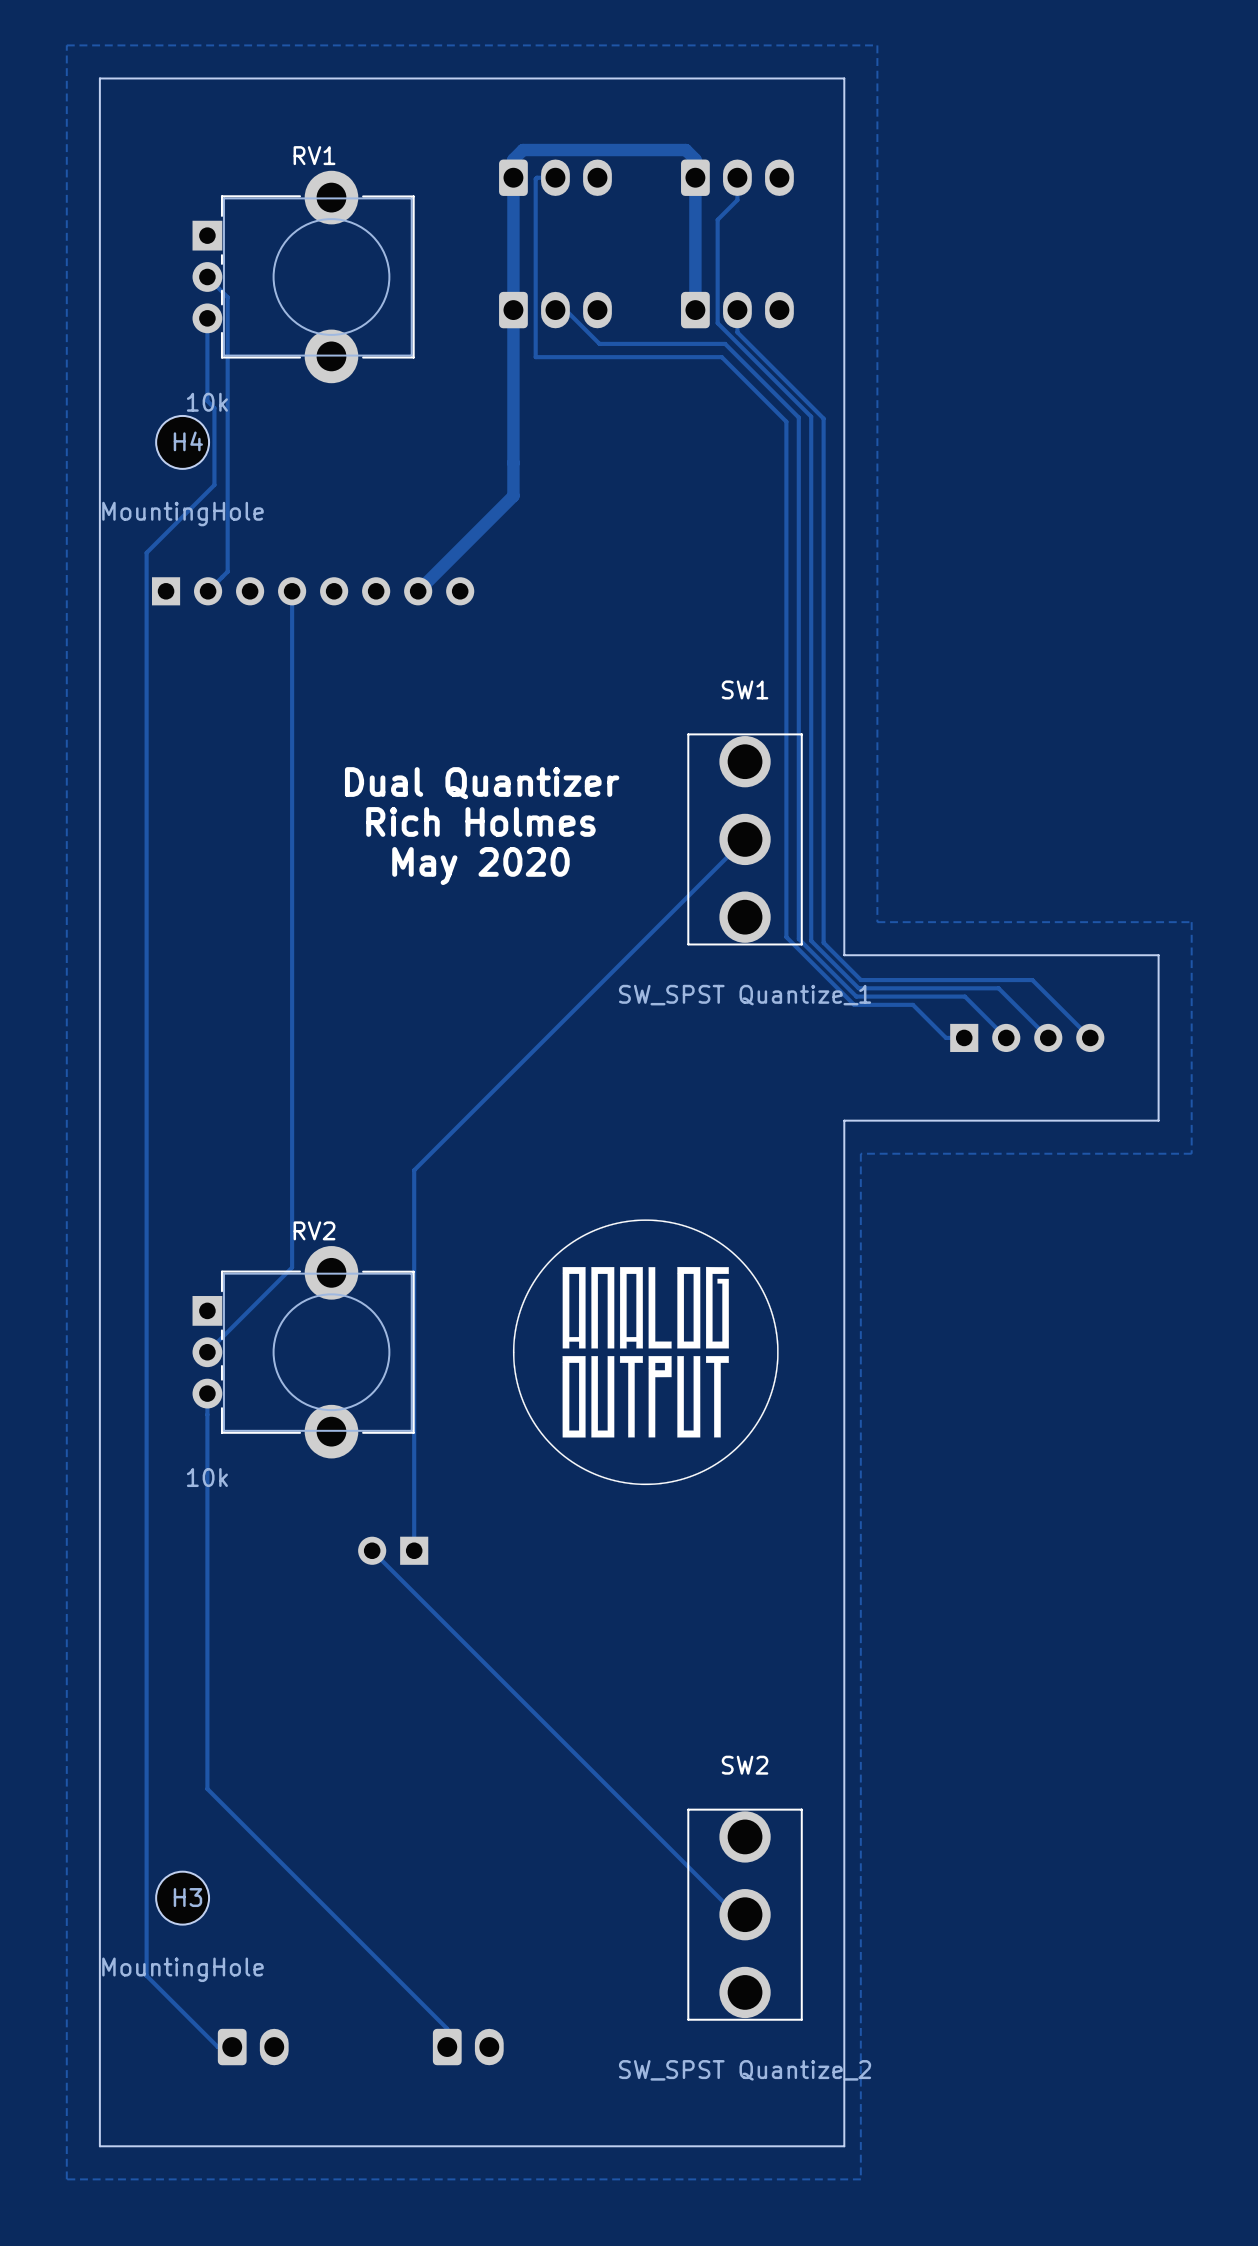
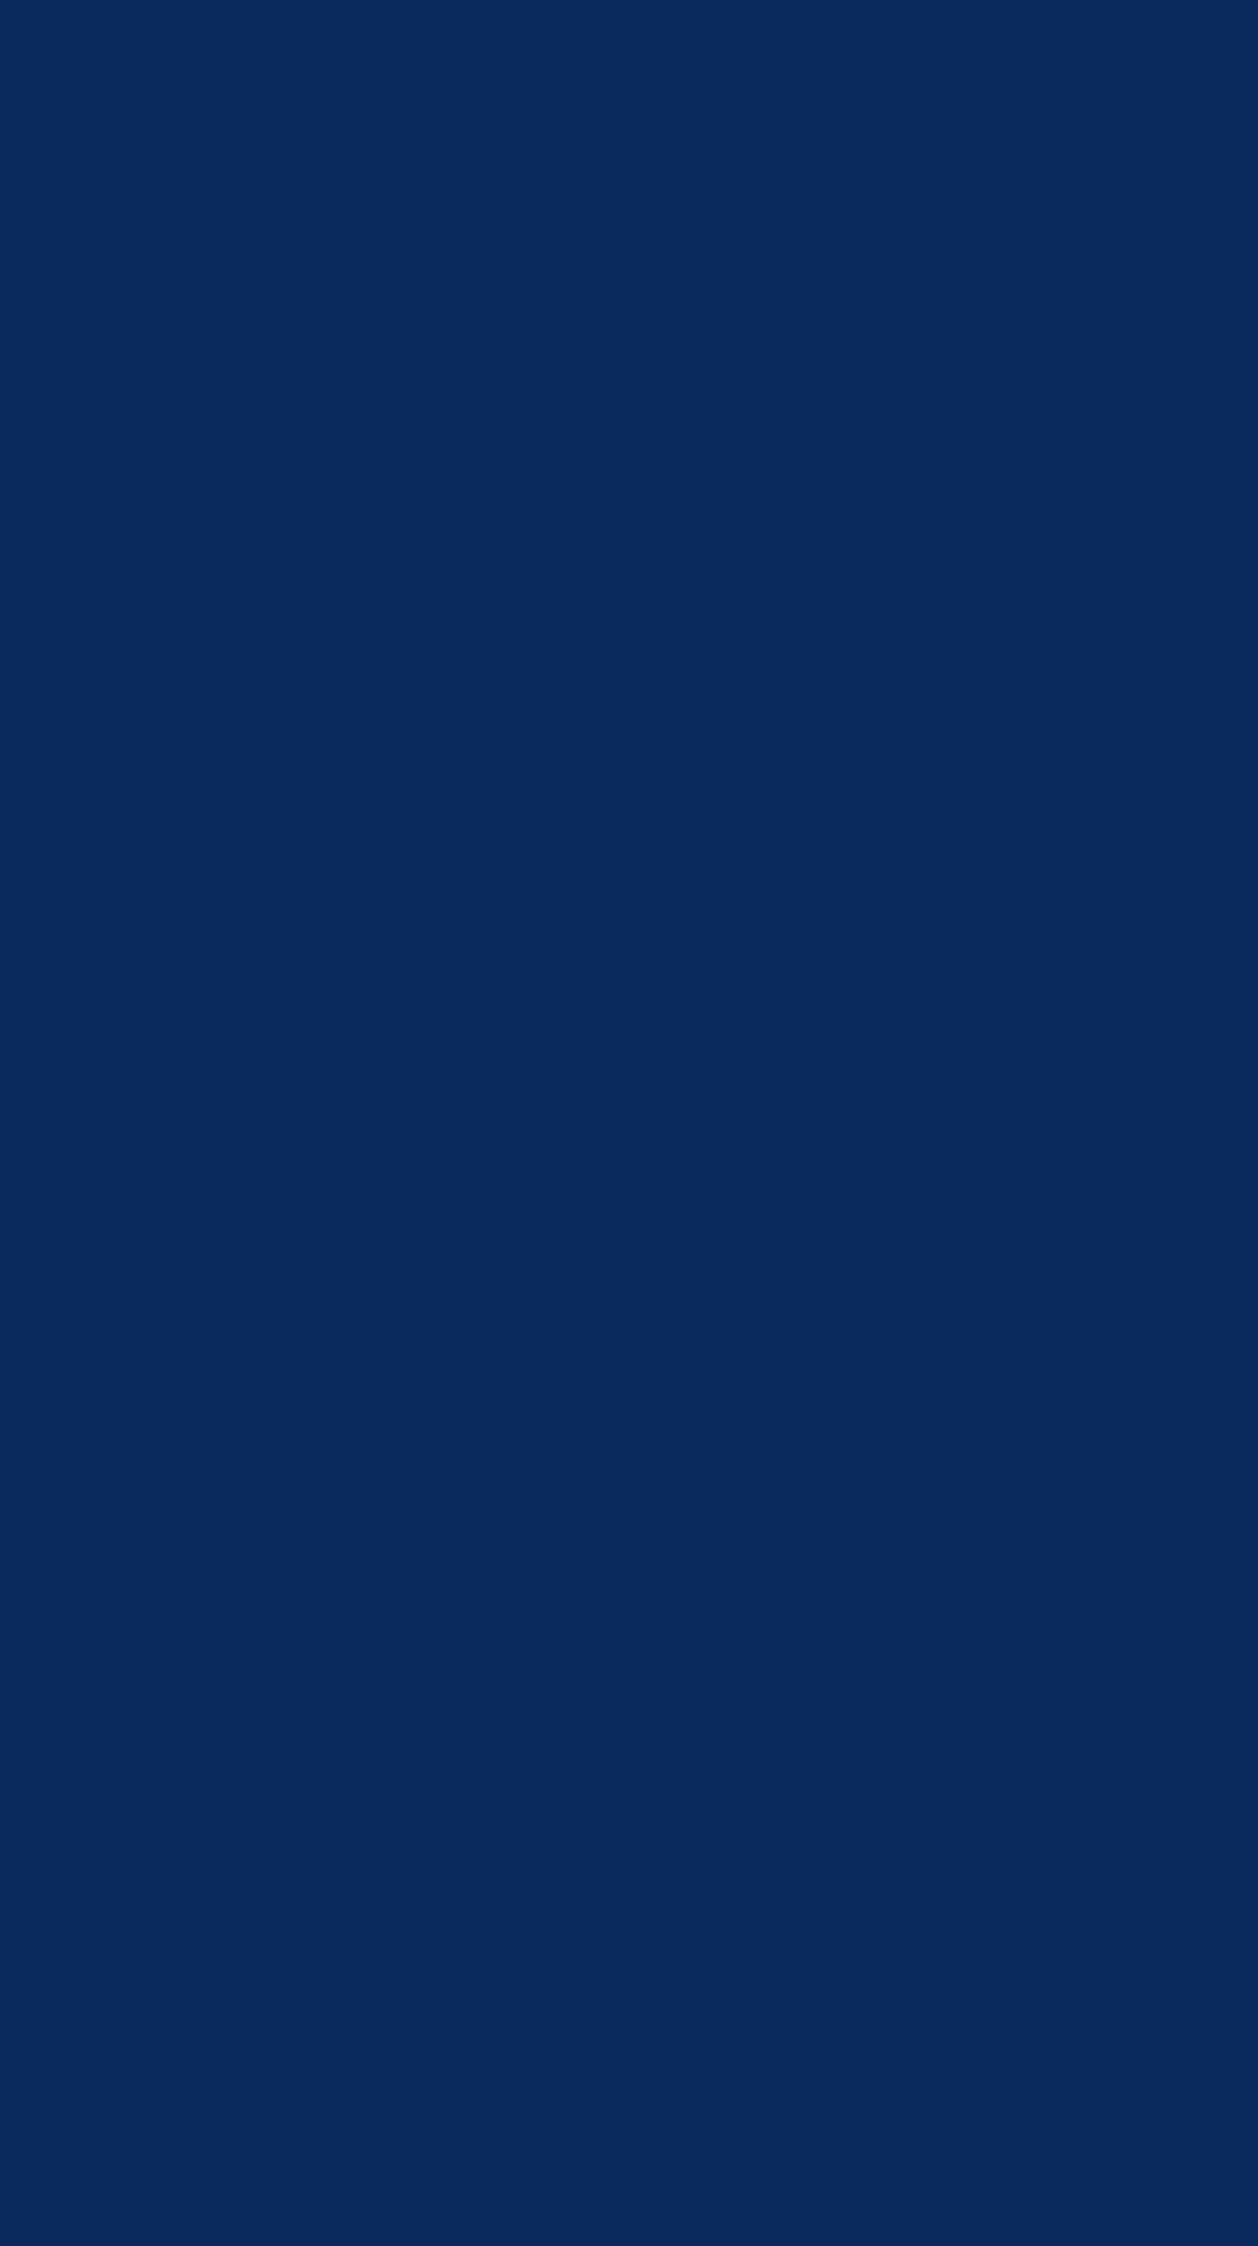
zone outline: (66, 45) (66, 2179) (860, 2179) (860, 1153) (1191, 1153) (1191, 922) (877, 922) (877, 45) (66, 45) -> none
board edge: (99, 78) (844, 78) (844, 955) (1158, 955) (1158, 1120) (844, 1120) (844, 2146) (99, 2146) (99, 78) -> none
track: (555, 177) (535, 178) (535, 357) (721, 357) (786, 421) (786, 937) (854, 1004) (912, 1004) (946, 1037) (964, 1037) -> none
part: (555, 177) -> none
track: (737, 177) (737, 200) (717, 219) (717, 323) (811, 416) (811, 940) (858, 988) (998, 988) (1048, 1037) -> none
part: (737, 177) -> none
track: (207, 276) (227, 297) (227, 571) (208, 591) -> none
RV1: 10k (303, 276) -> none
track: (555, 310) (565, 310) (599, 343) (725, 343) (798, 417) (798, 938) (856, 996) (964, 996) (1006, 1037) -> none
part: (555, 310) -> none
track: (695, 310) (695, 159) (685, 150) (522, 150) (513, 159) (513, 496) (418, 591) -> none
track: (737, 310) (737, 332) (823, 418) (823, 942) (860, 980) (1032, 980) (1090, 1037) -> none
part: (737, 310) -> none
track: (207, 318) (207, 401) (214, 408) (214, 485) (146, 552) (146, 1975) (217, 2047) (232, 2047) -> none
H4: MountingHole (182, 442) -> none
track: (292, 591) (292, 1267) (207, 1352) -> none
part: (313, 591) -> none
text: Dual Quantizer (482, 783) -> none
text: Rich Holmes (480, 821) -> none
track: (745, 839) (414, 1170) (414, 1550) -> none
SW1: SW_SPST Quantize_1 (745, 839) -> none
text: May 2020 (480, 866) -> none
part: (1027, 1037) -> none
drawing: [512, 1219, 779, 1486] -> none
RV2: 10k (303, 1352) -> none
track: (207, 1393) (207, 1788) (447, 2028) (447, 2047) -> none
track: (372, 1550) (736, 1914) (745, 1914) -> none
part: (393, 1550) -> none
H3: MountingHole (182, 1898) -> none
SW2: SW_SPST Quantize_2 (745, 1914) -> none
part: (253, 2047) -> none
part: (468, 2047) -> none

